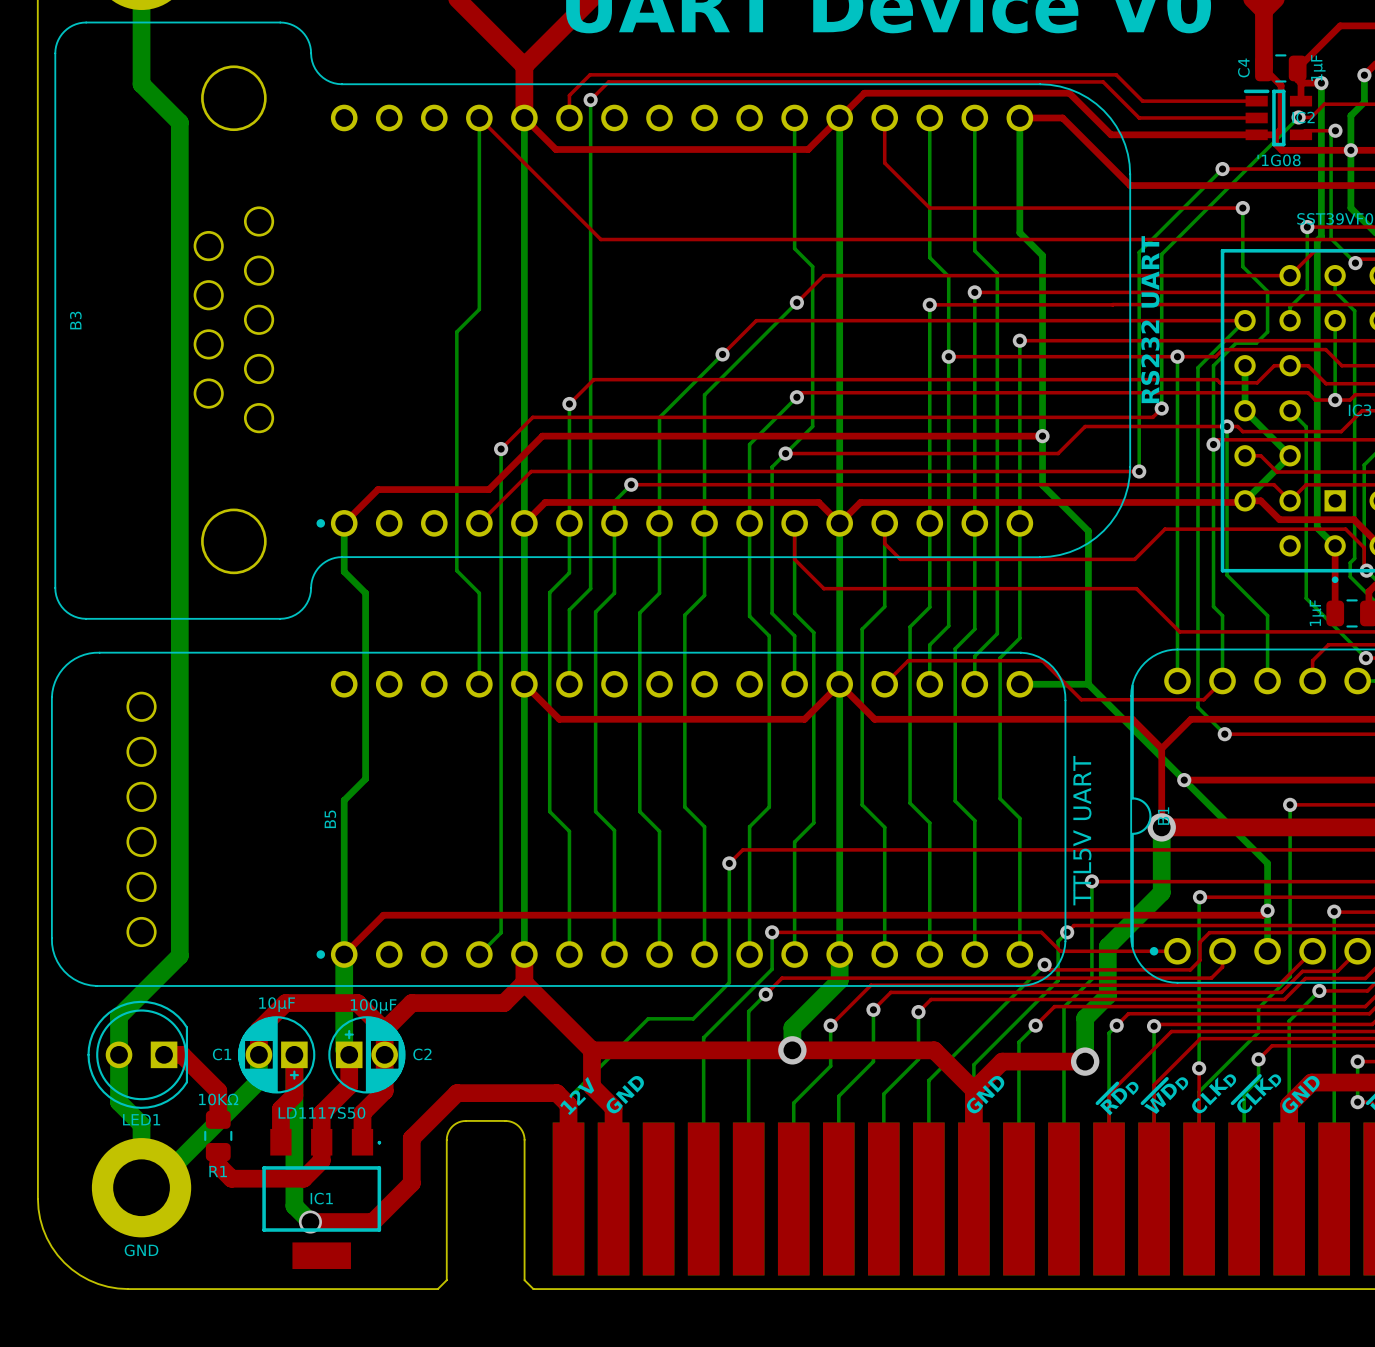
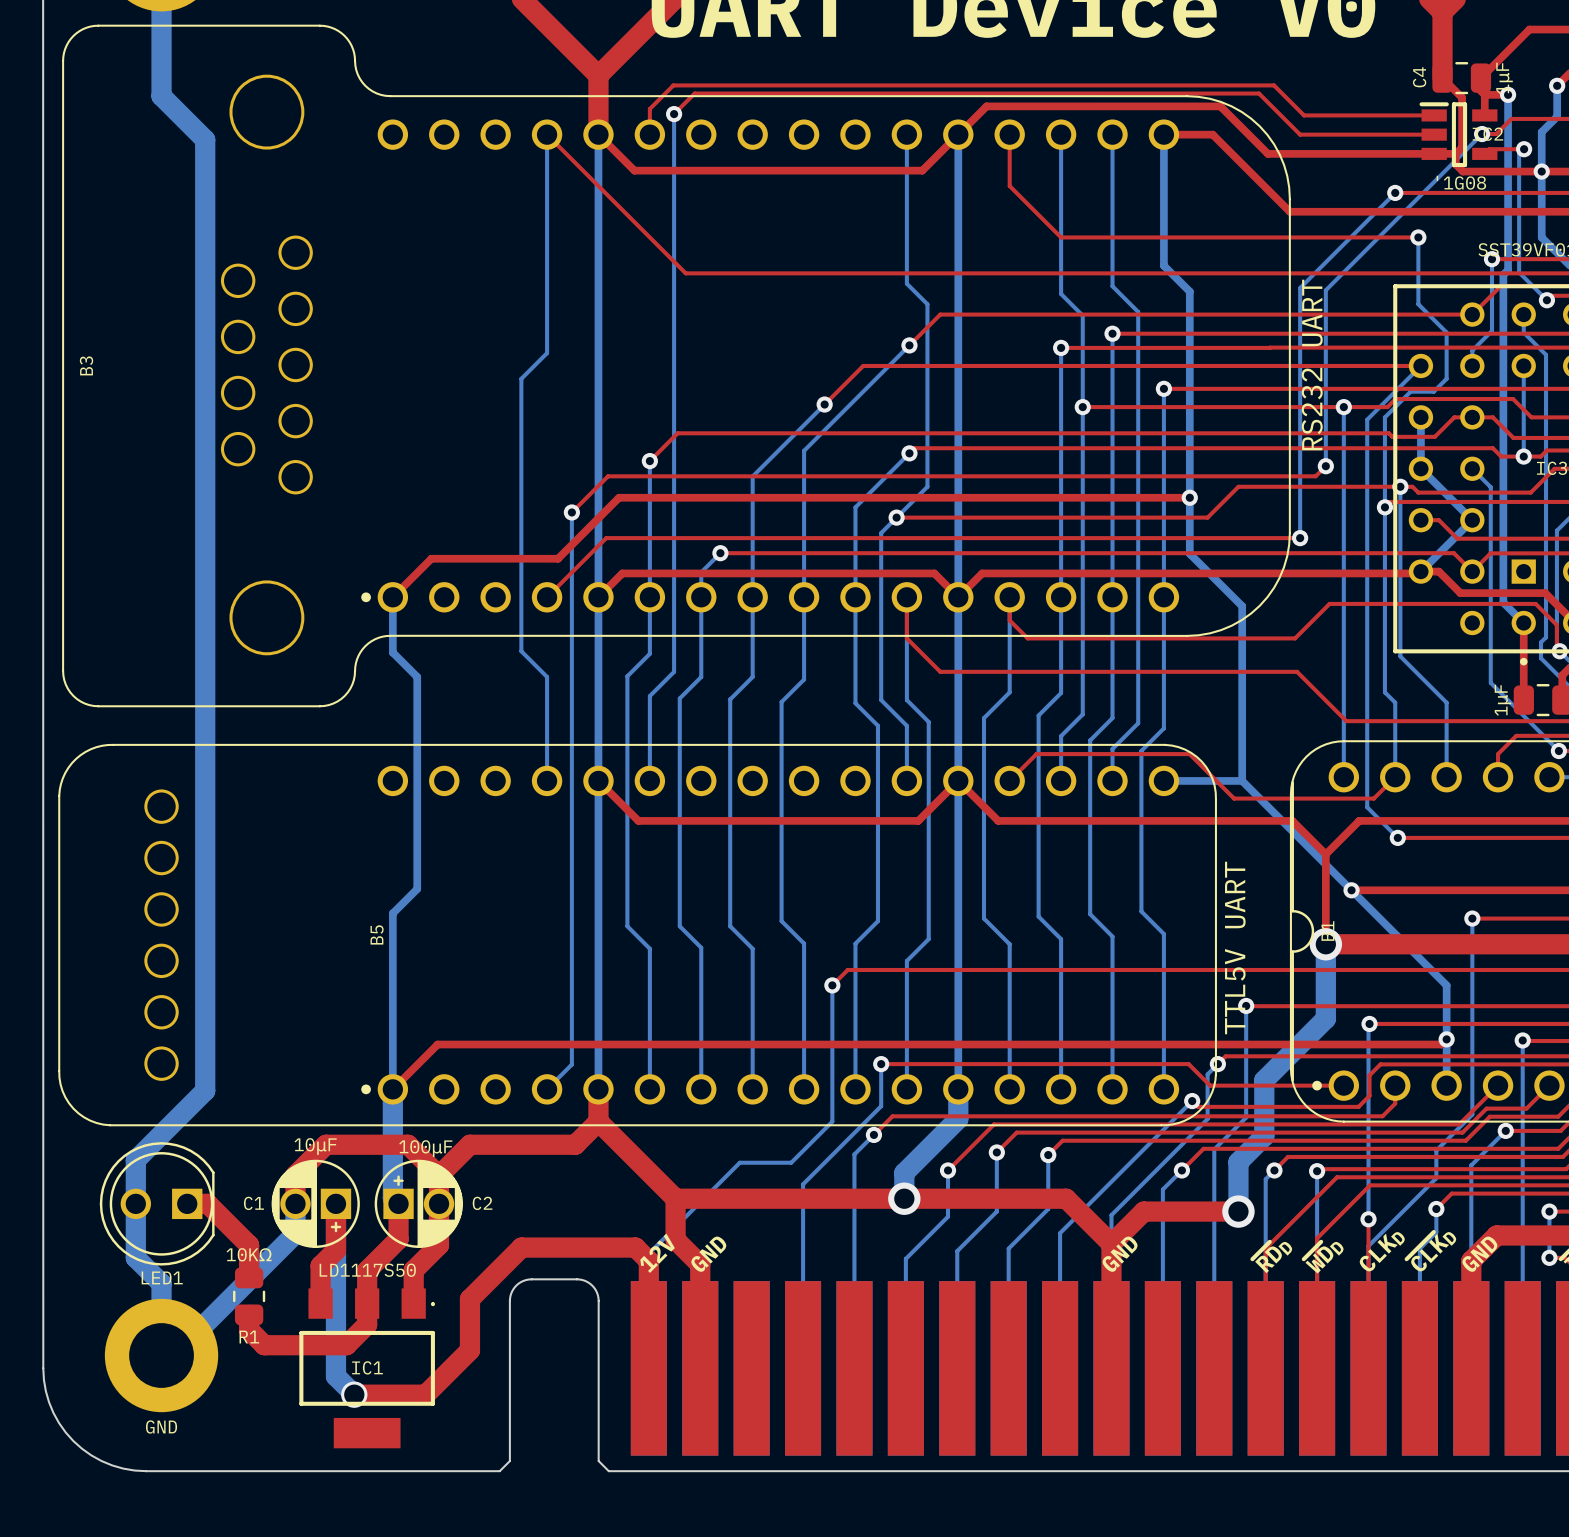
B3 text: none -> RS232 UART (1312, 365)
B3 text: RS232 UART (1150, 319) -> none

